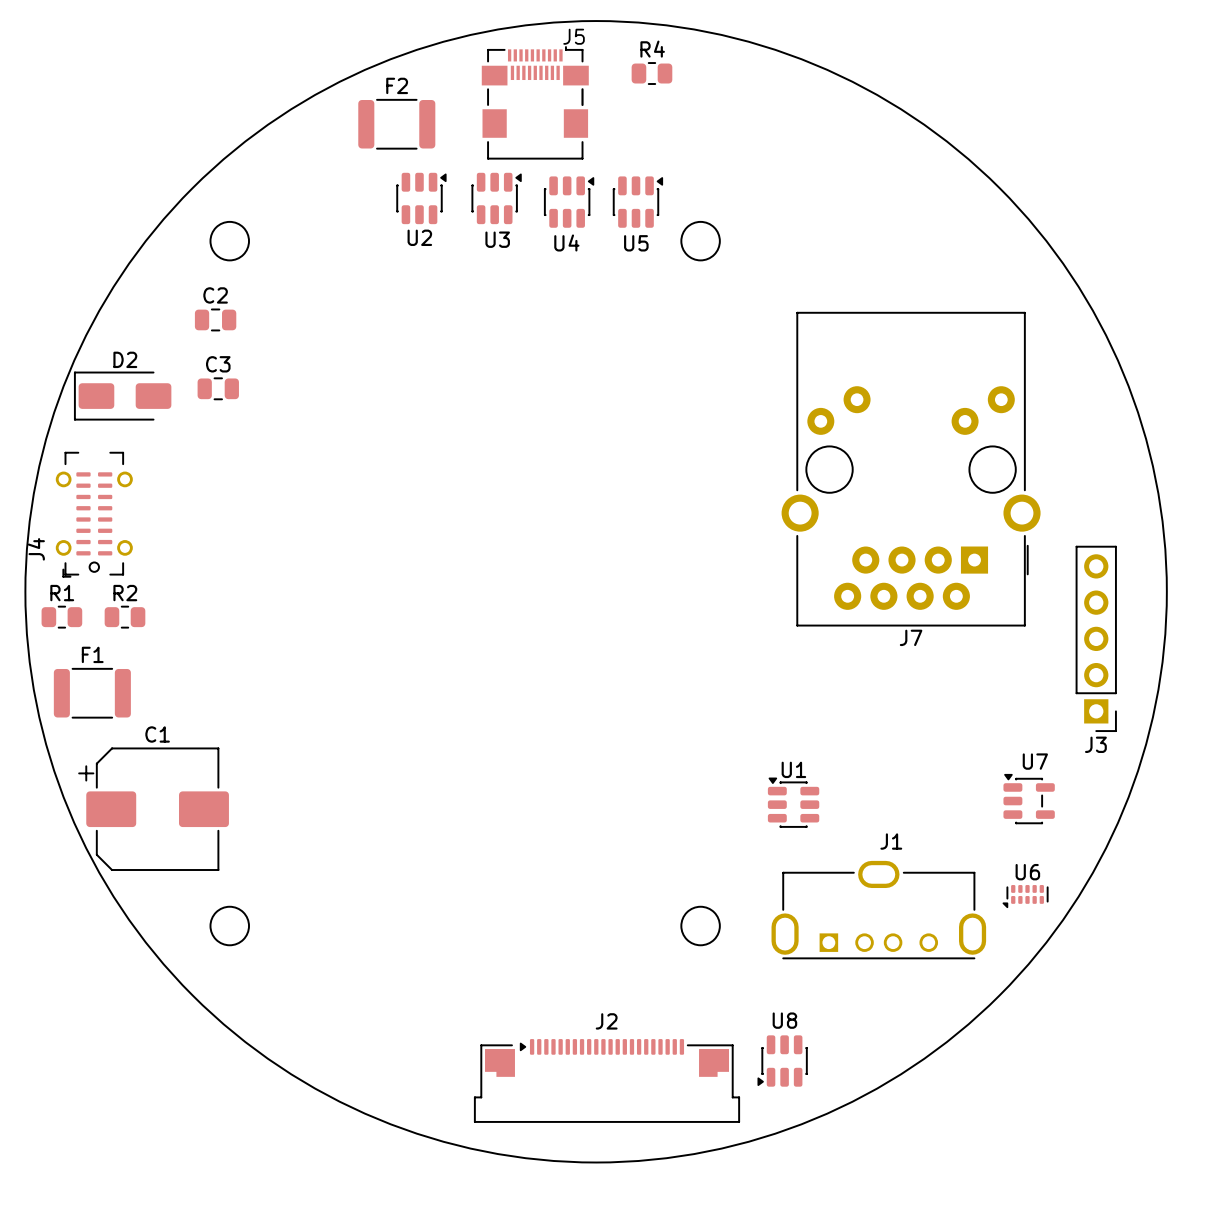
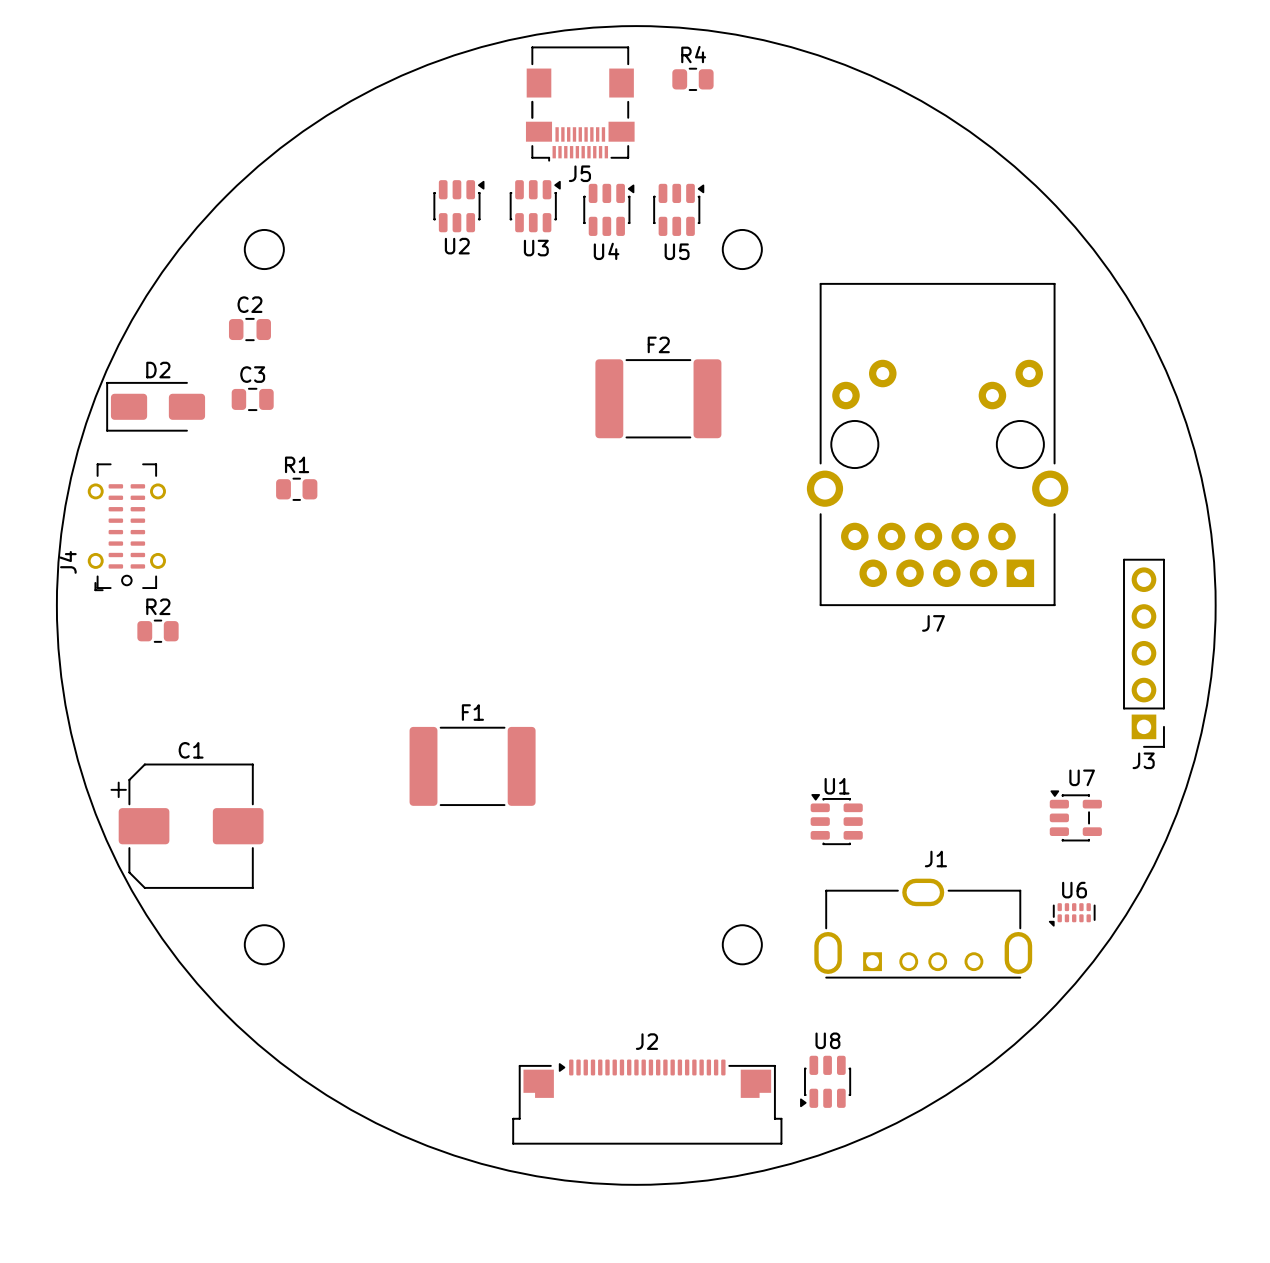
J5 name position: J5 (574, 36) -> J5 (579, 173)
F2 footprint: [358, 98, 436, 150] -> [595, 359, 722, 439]
J5 rotation: 0° (535, 102) -> 180° (580, 104)
J7 footprint: [781, 311, 1041, 627] -> [806, 283, 1069, 607]
R1 position: (61, 617) -> (296, 489)
F1 footprint: [53, 667, 131, 719] -> [409, 726, 536, 806]

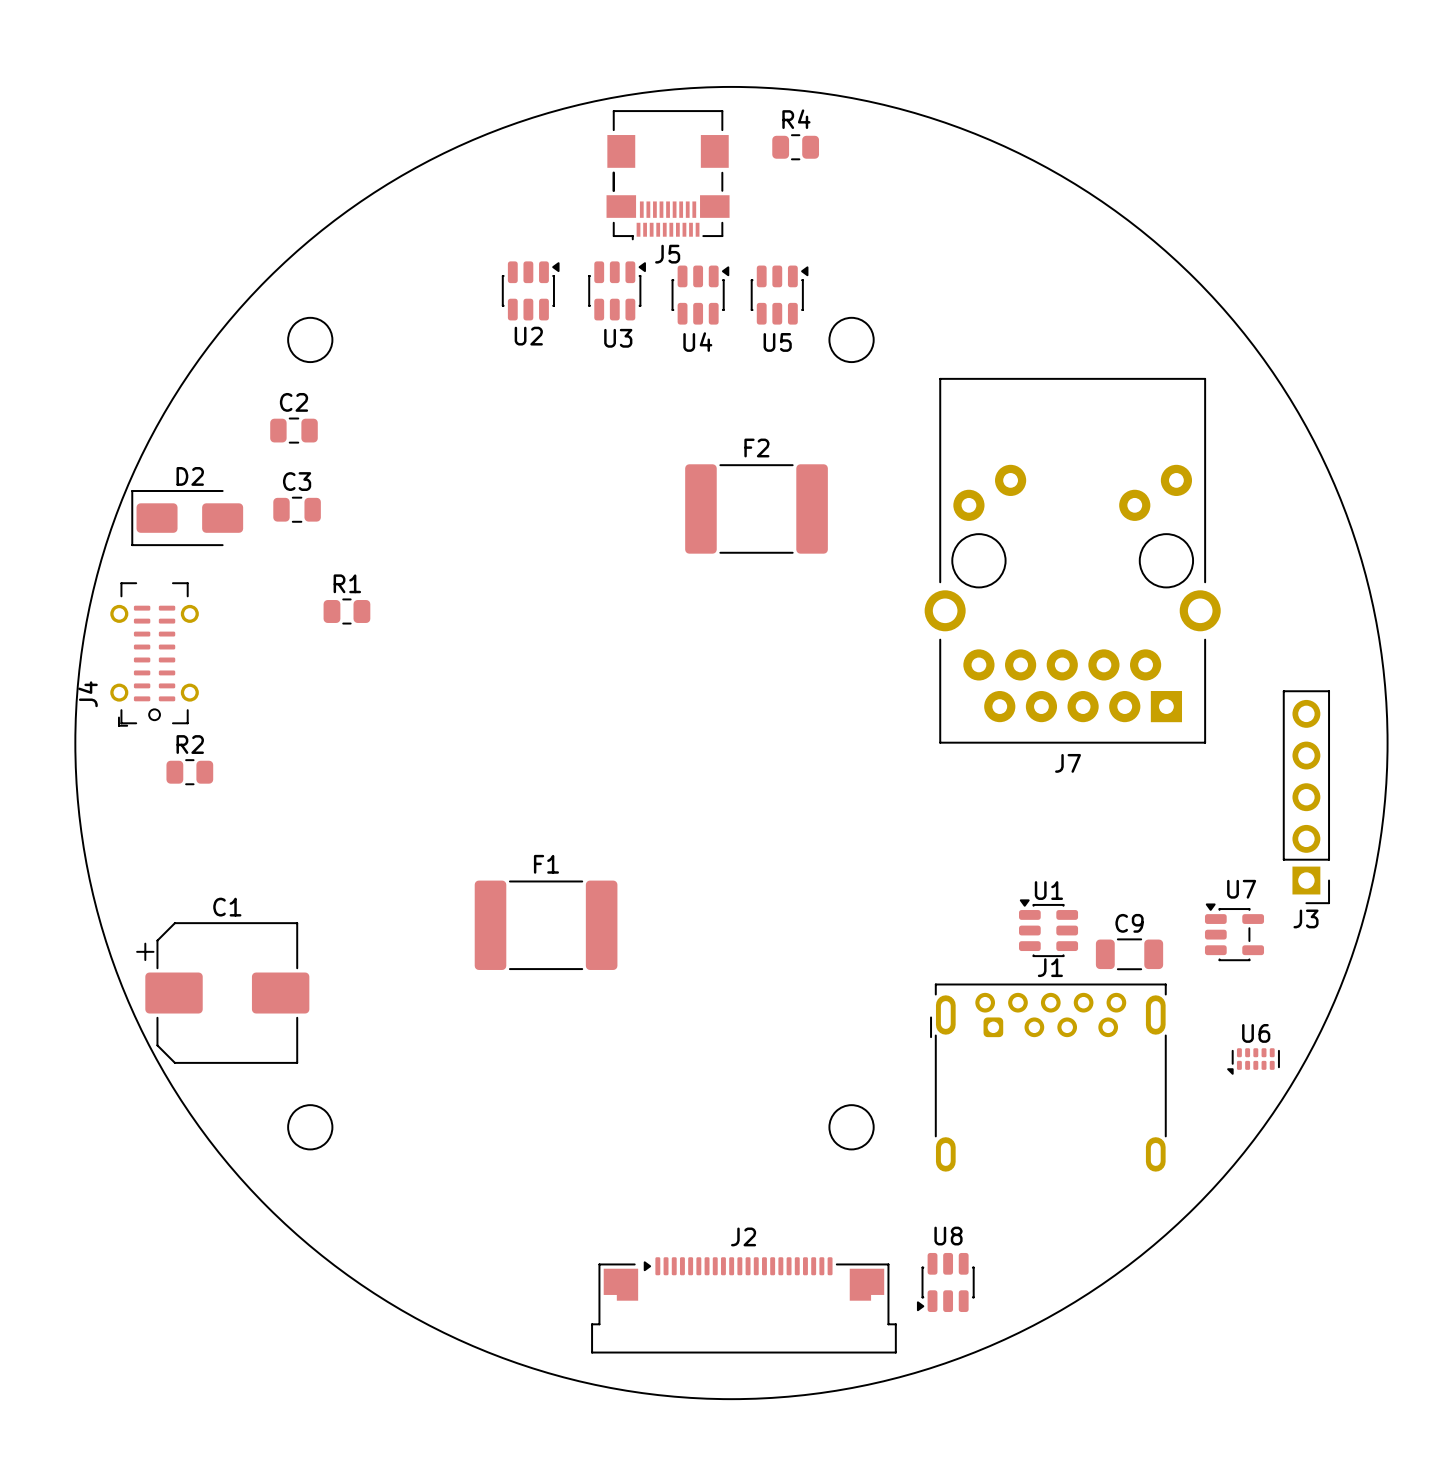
C9: none -> (1129, 954)
U7 position: (1075, 815) -> (1234, 932)
U1 position: (836, 819) -> (1048, 928)
J1 name position: J1 (935, 859) -> J1 (1050, 967)
J1 footprint: [814, 878, 1033, 979] -> [930, 983, 1167, 1172]
U6 position: (1072, 914) -> (1253, 1061)

